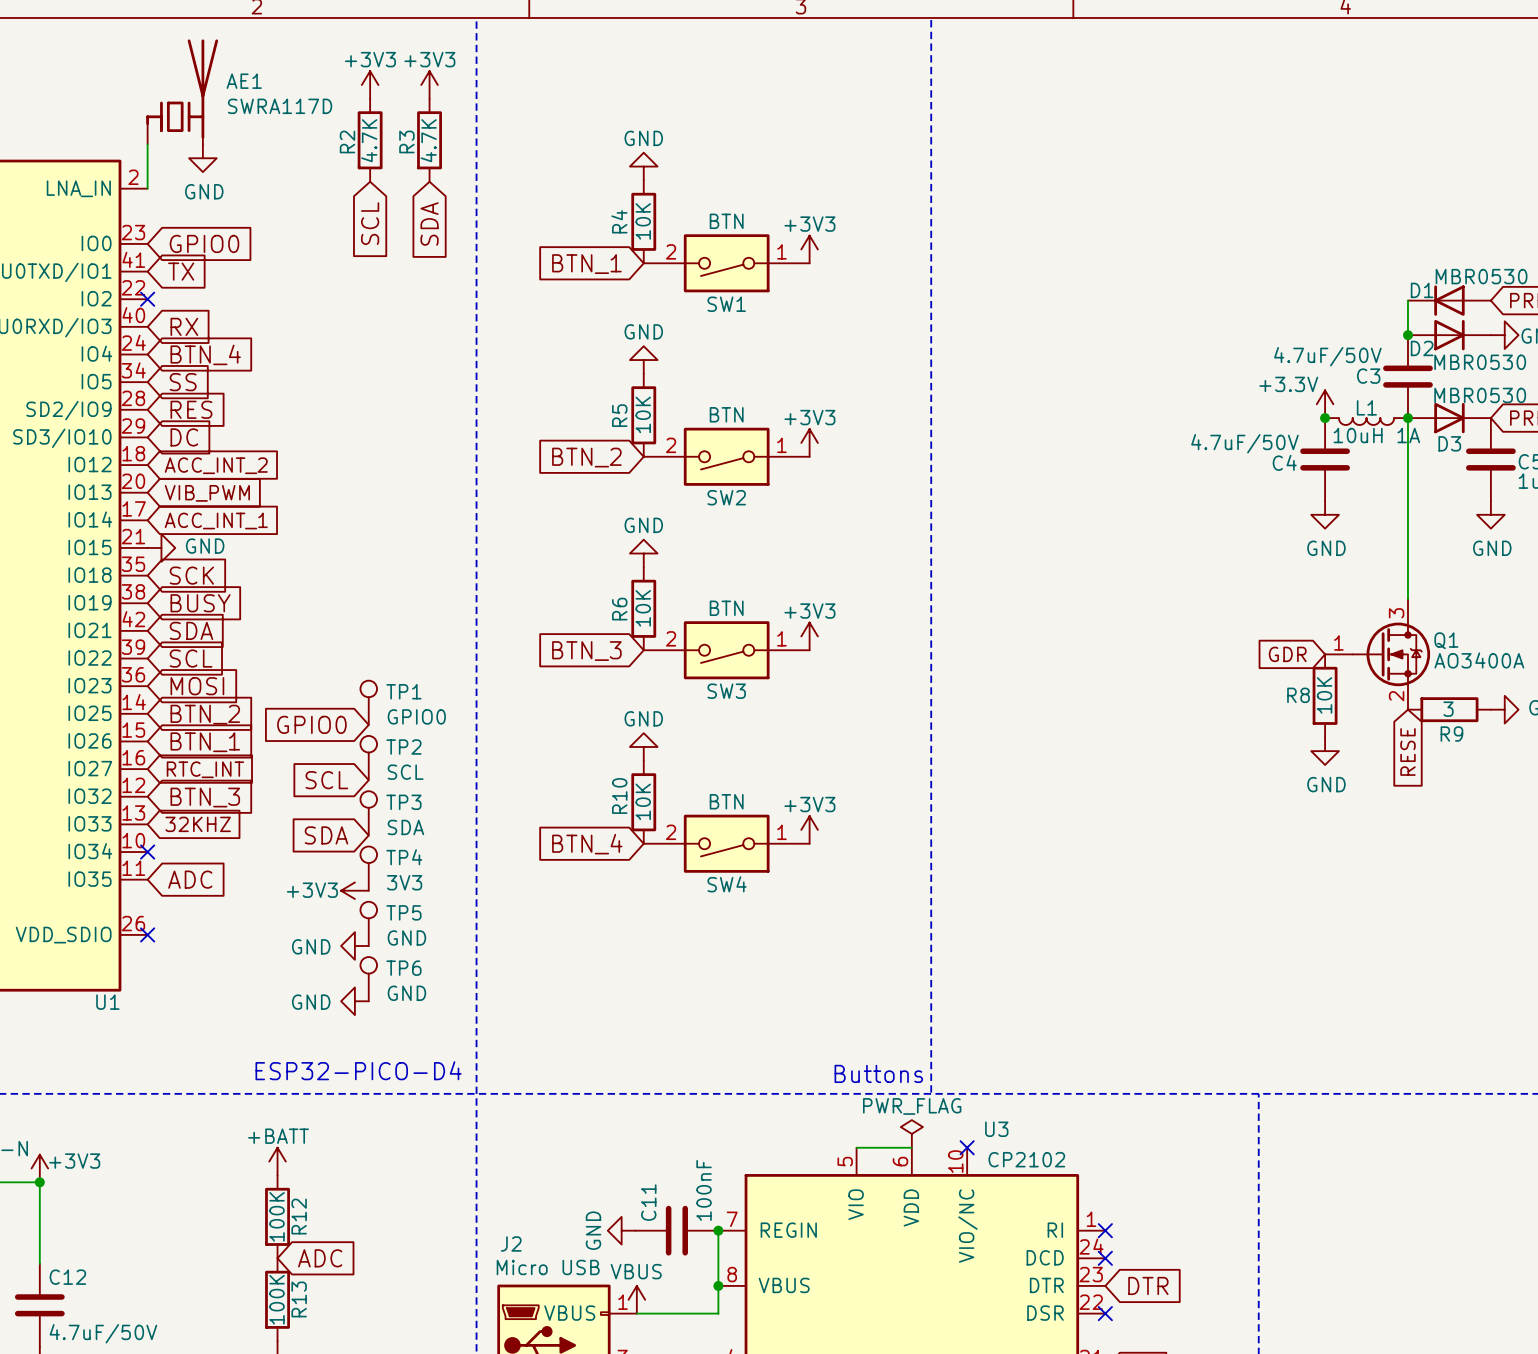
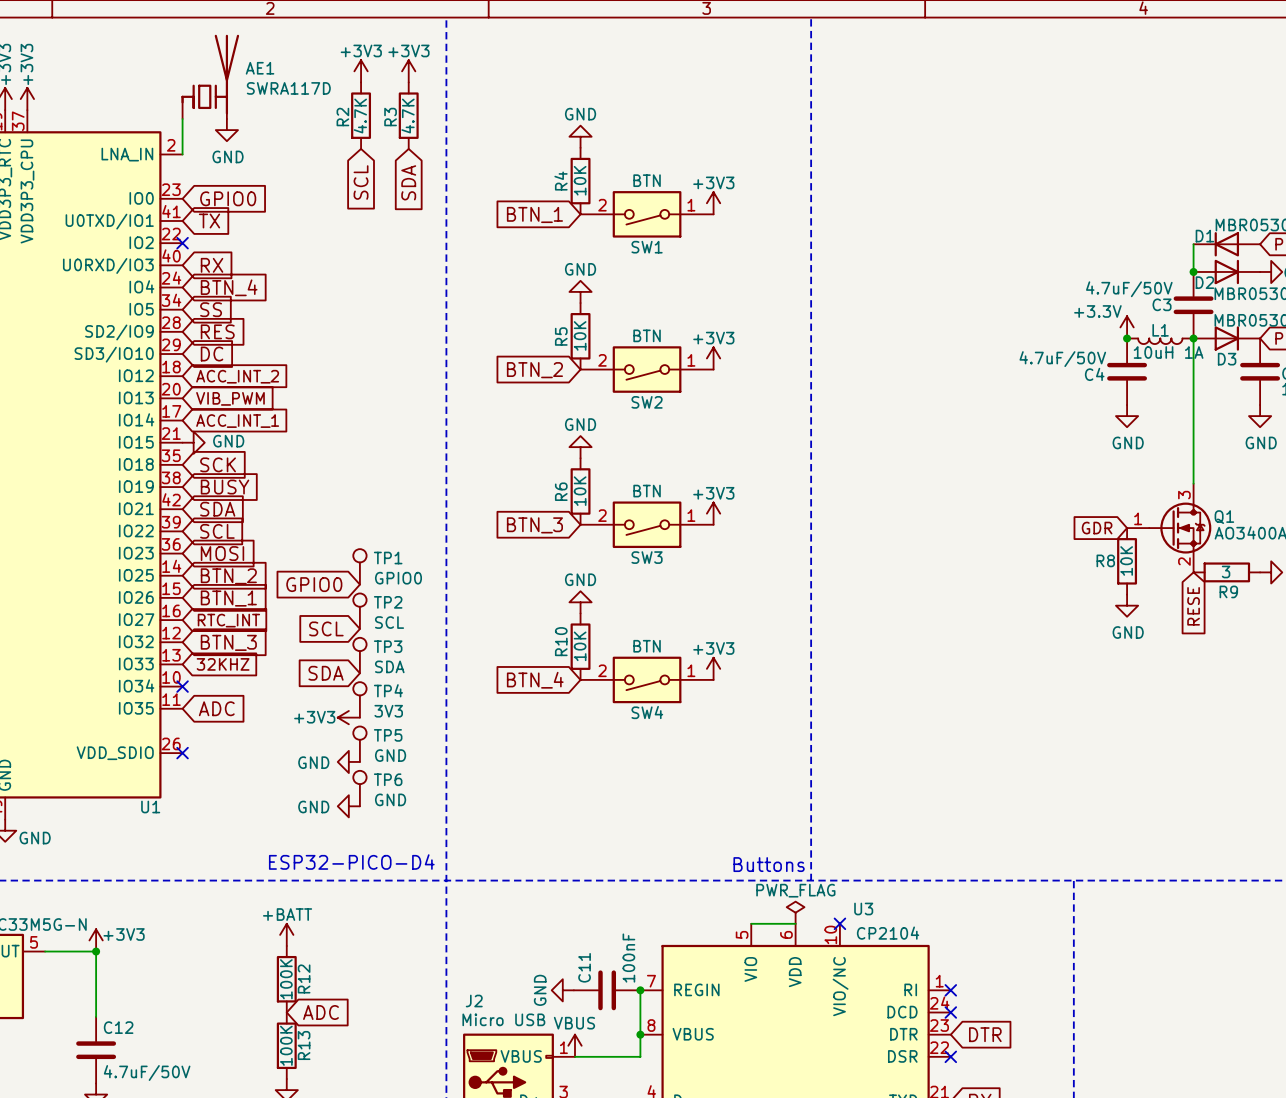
U3 value: CP2102 (1026, 1159) -> CP2104 (888, 933)

